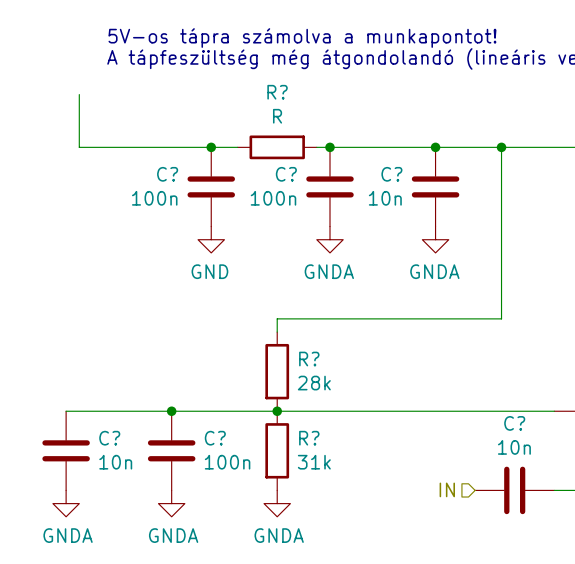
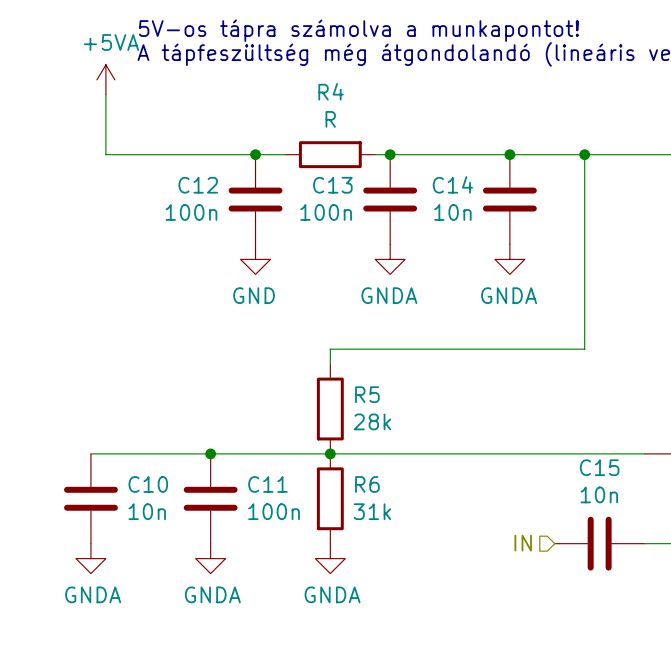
power symbol: none -> +5VA (105, 79)
R? name: R? (277, 92) -> R4 (331, 91)
C? name: C? (167, 174) -> C12 (198, 185)
C? name: C? (286, 174) -> C13 (332, 185)
C? name: C? (391, 174) -> C14 (452, 184)
R? name: R? (309, 359) -> R5 (367, 394)
C? name: C? (514, 423) -> C15 (599, 467)
C? name: C? (109, 438) -> C10 (148, 484)
C? name: C? (215, 438) -> C11 (267, 484)
R? name: R? (309, 438) -> R6 (367, 484)

